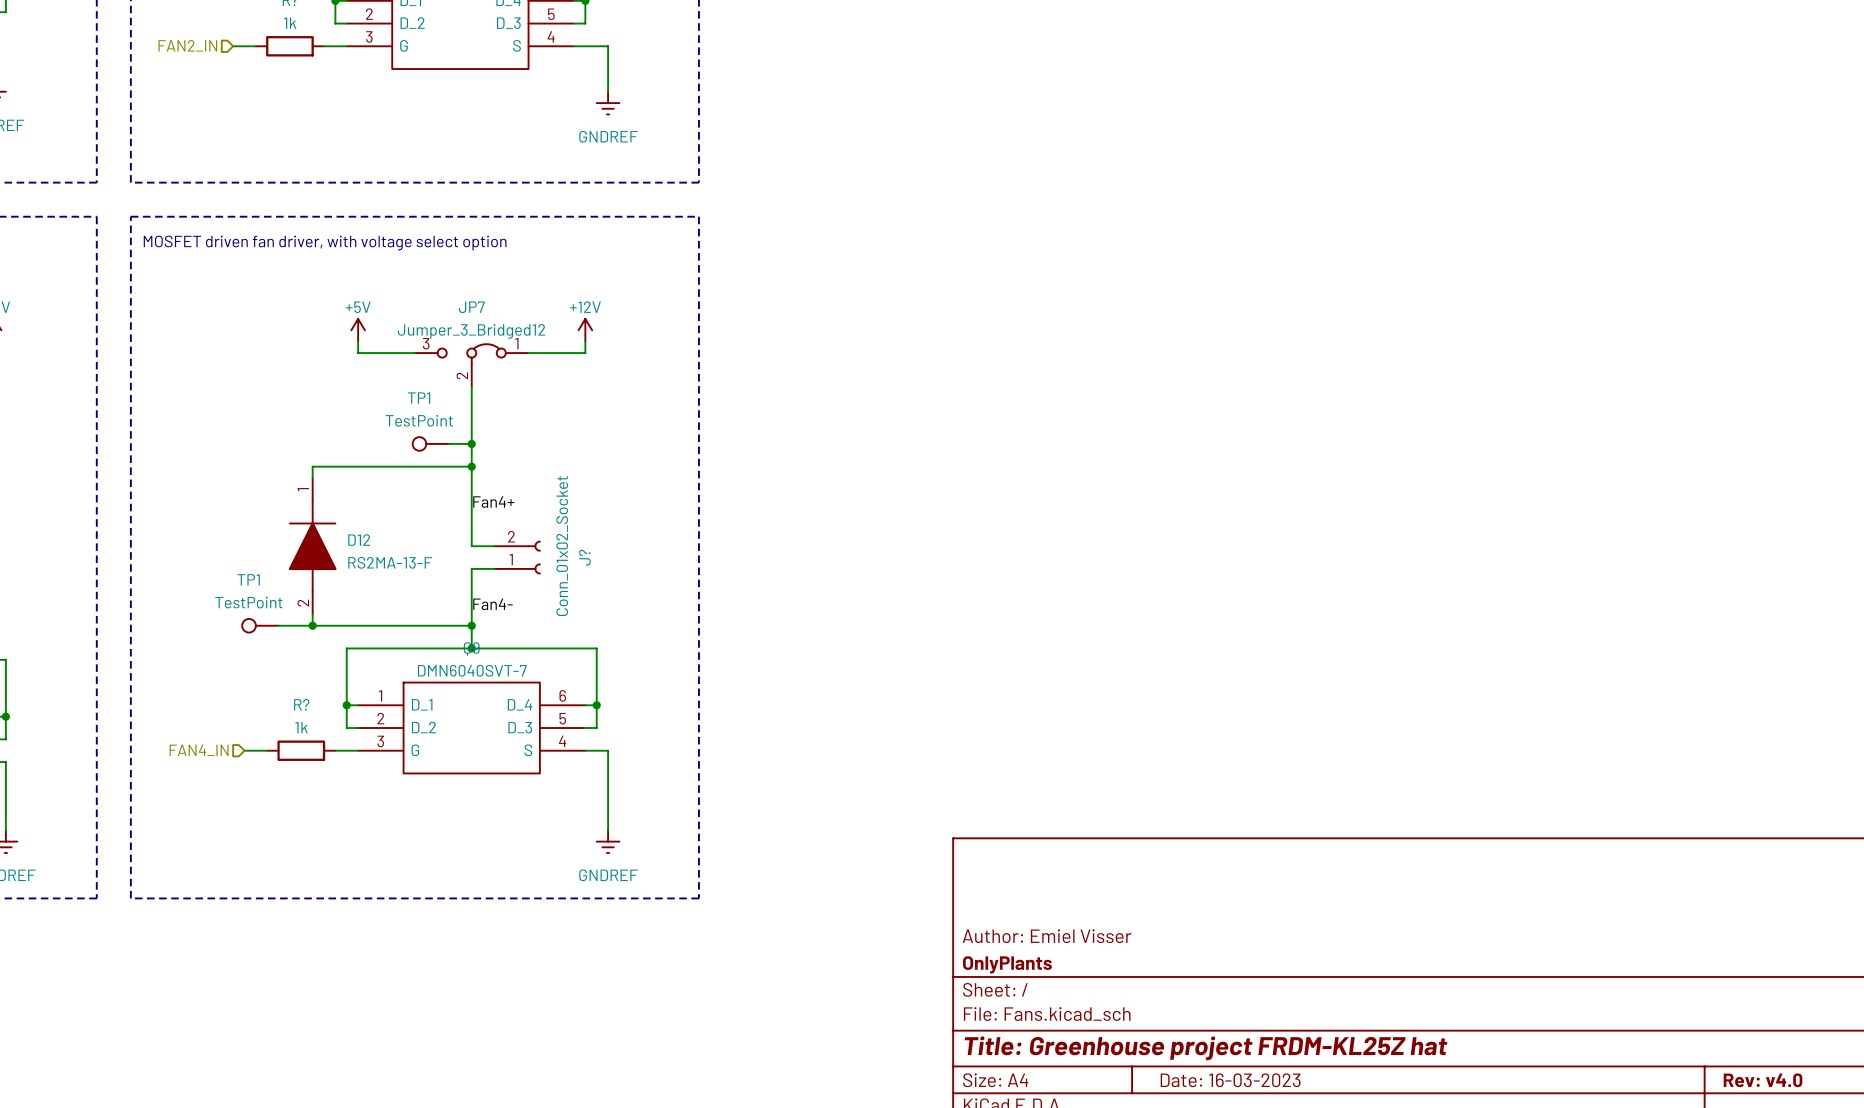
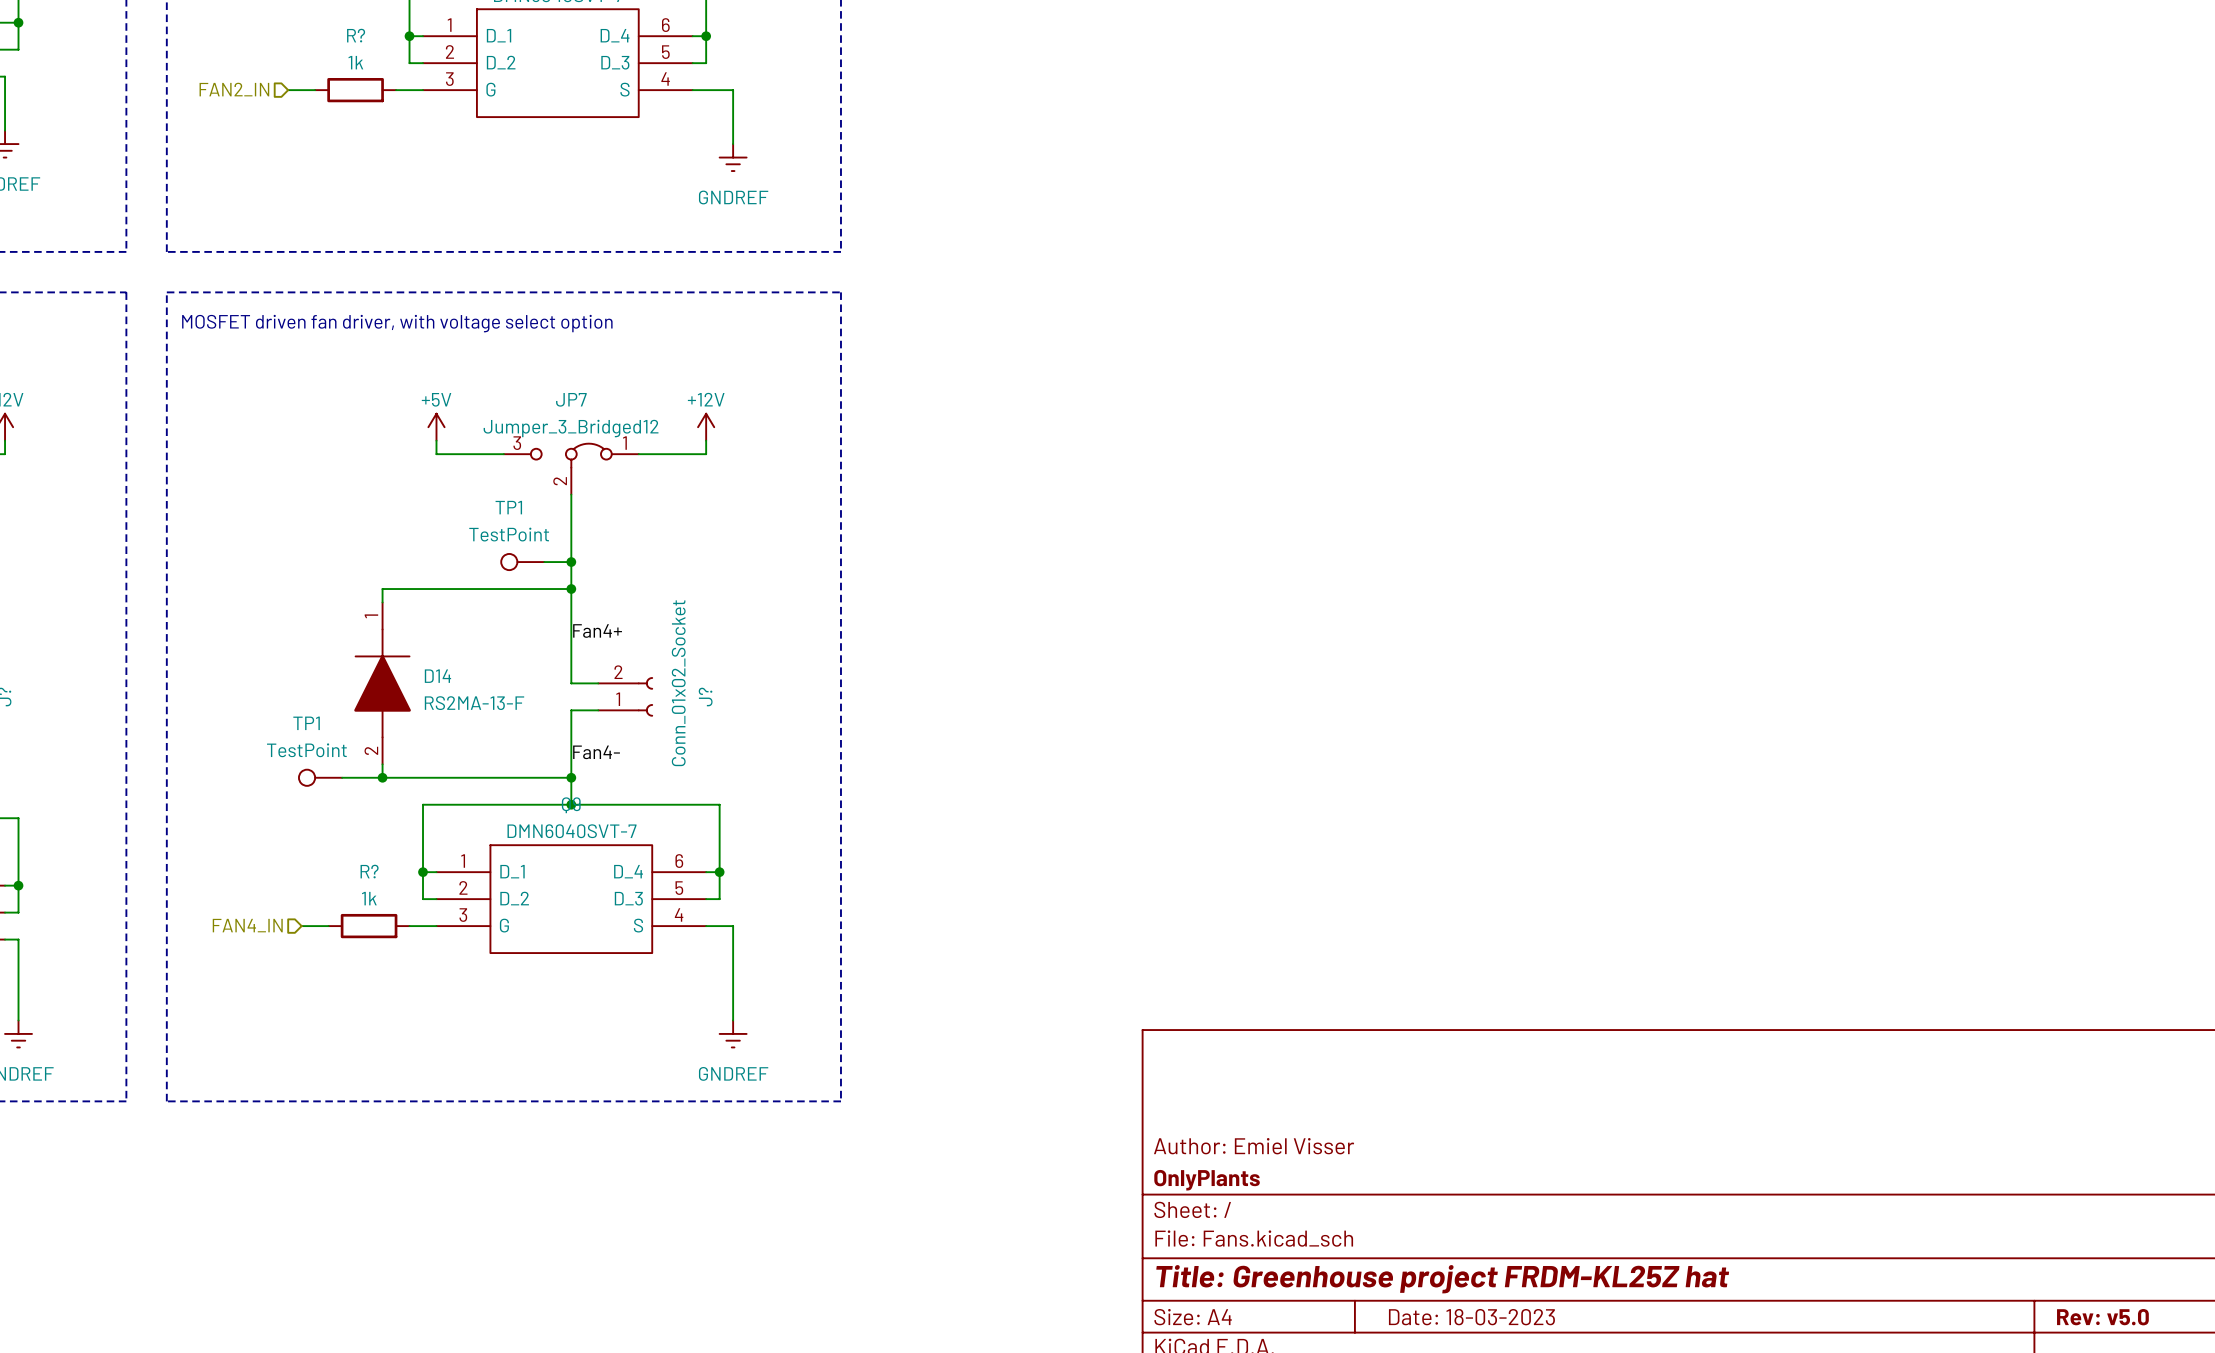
D12 name: D12 (359, 540) -> D14 (437, 676)
title block: Date: 16-03-2023 (1230, 1080) -> Date: 18-03-2023 (1471, 1317)
title block: Rev: v4.0 (1763, 1080) -> Rev: v5.0 (2102, 1317)

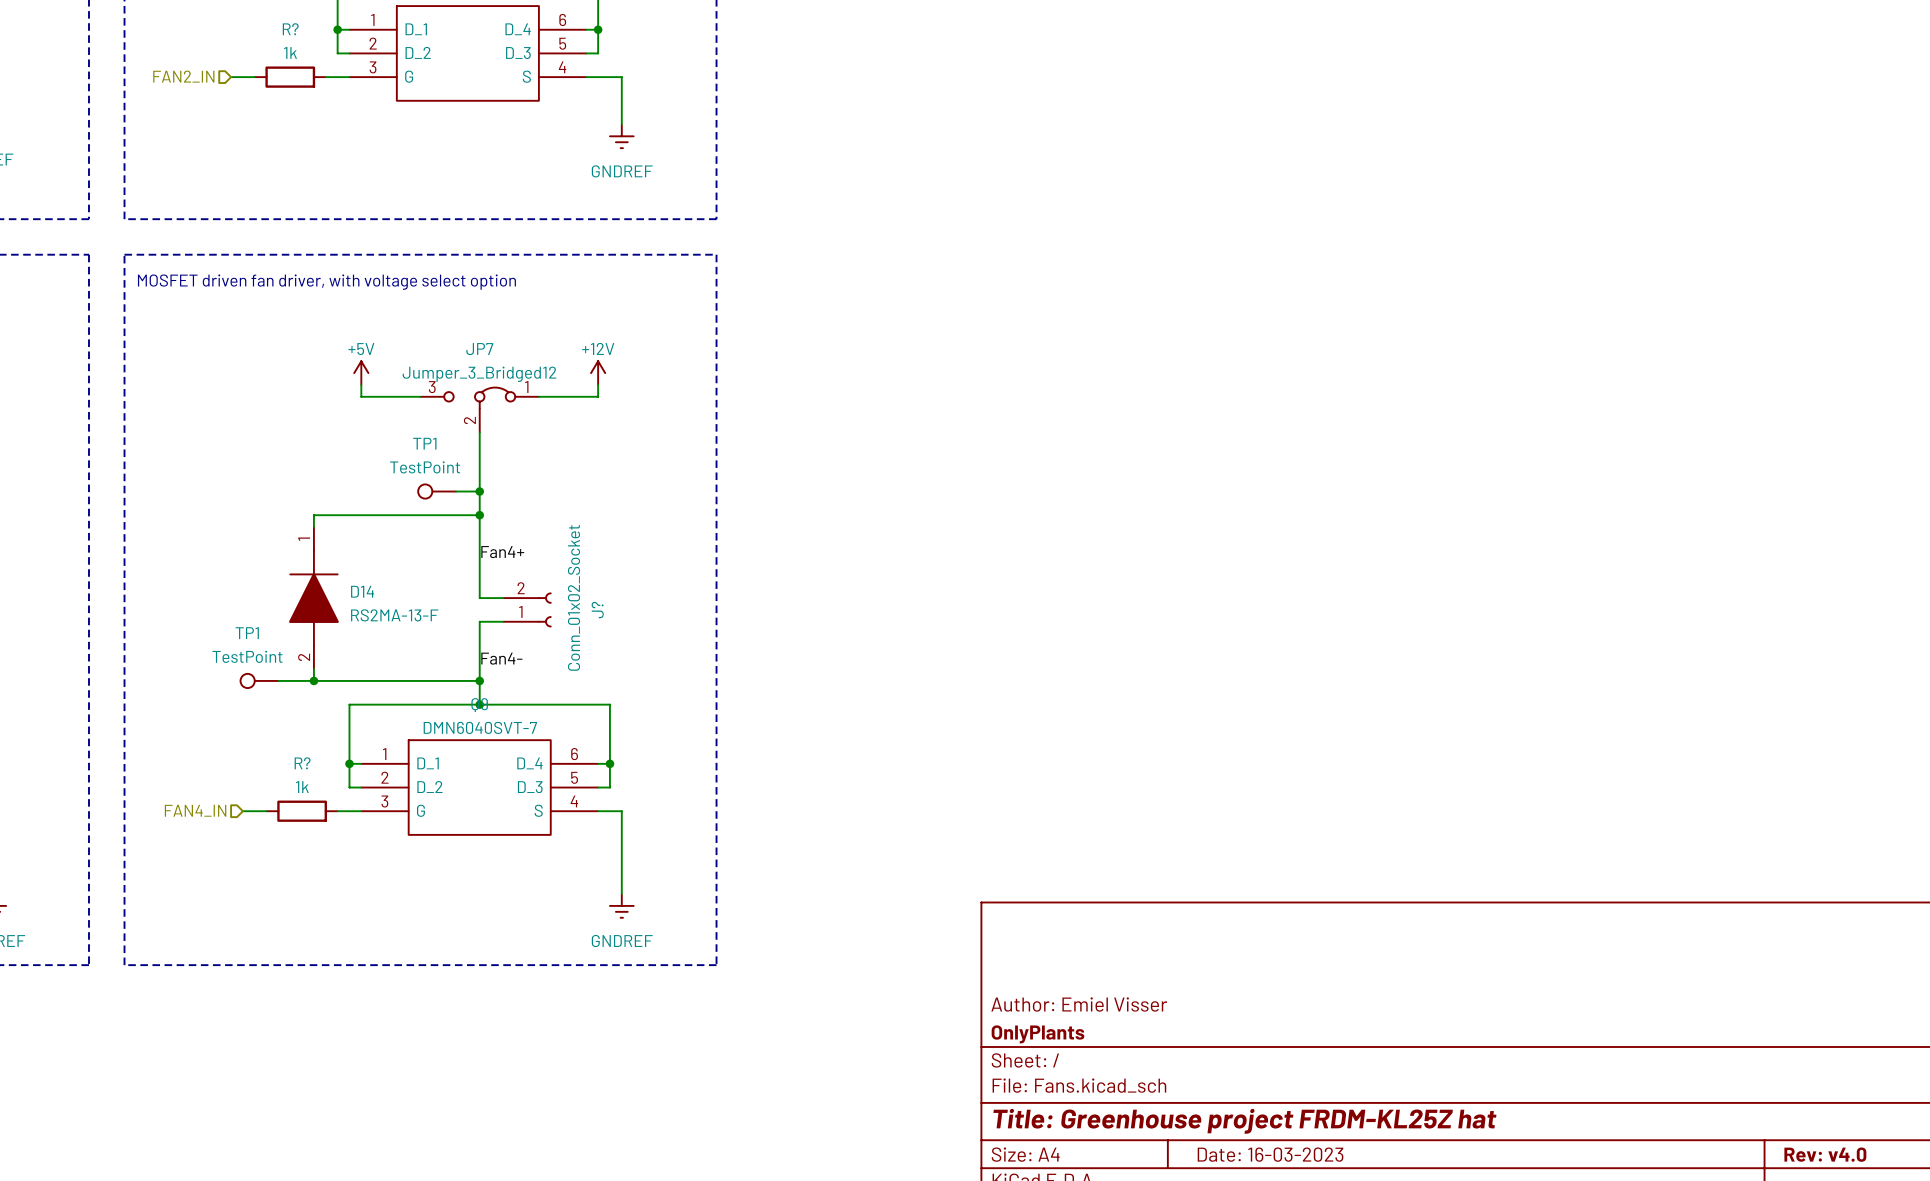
title block: Date: 18-03-2023 (1471, 1317) -> Date: 16-03-2023 (1270, 1154)
title block: Rev: v5.0 (2102, 1317) -> Rev: v4.0 (1825, 1154)

